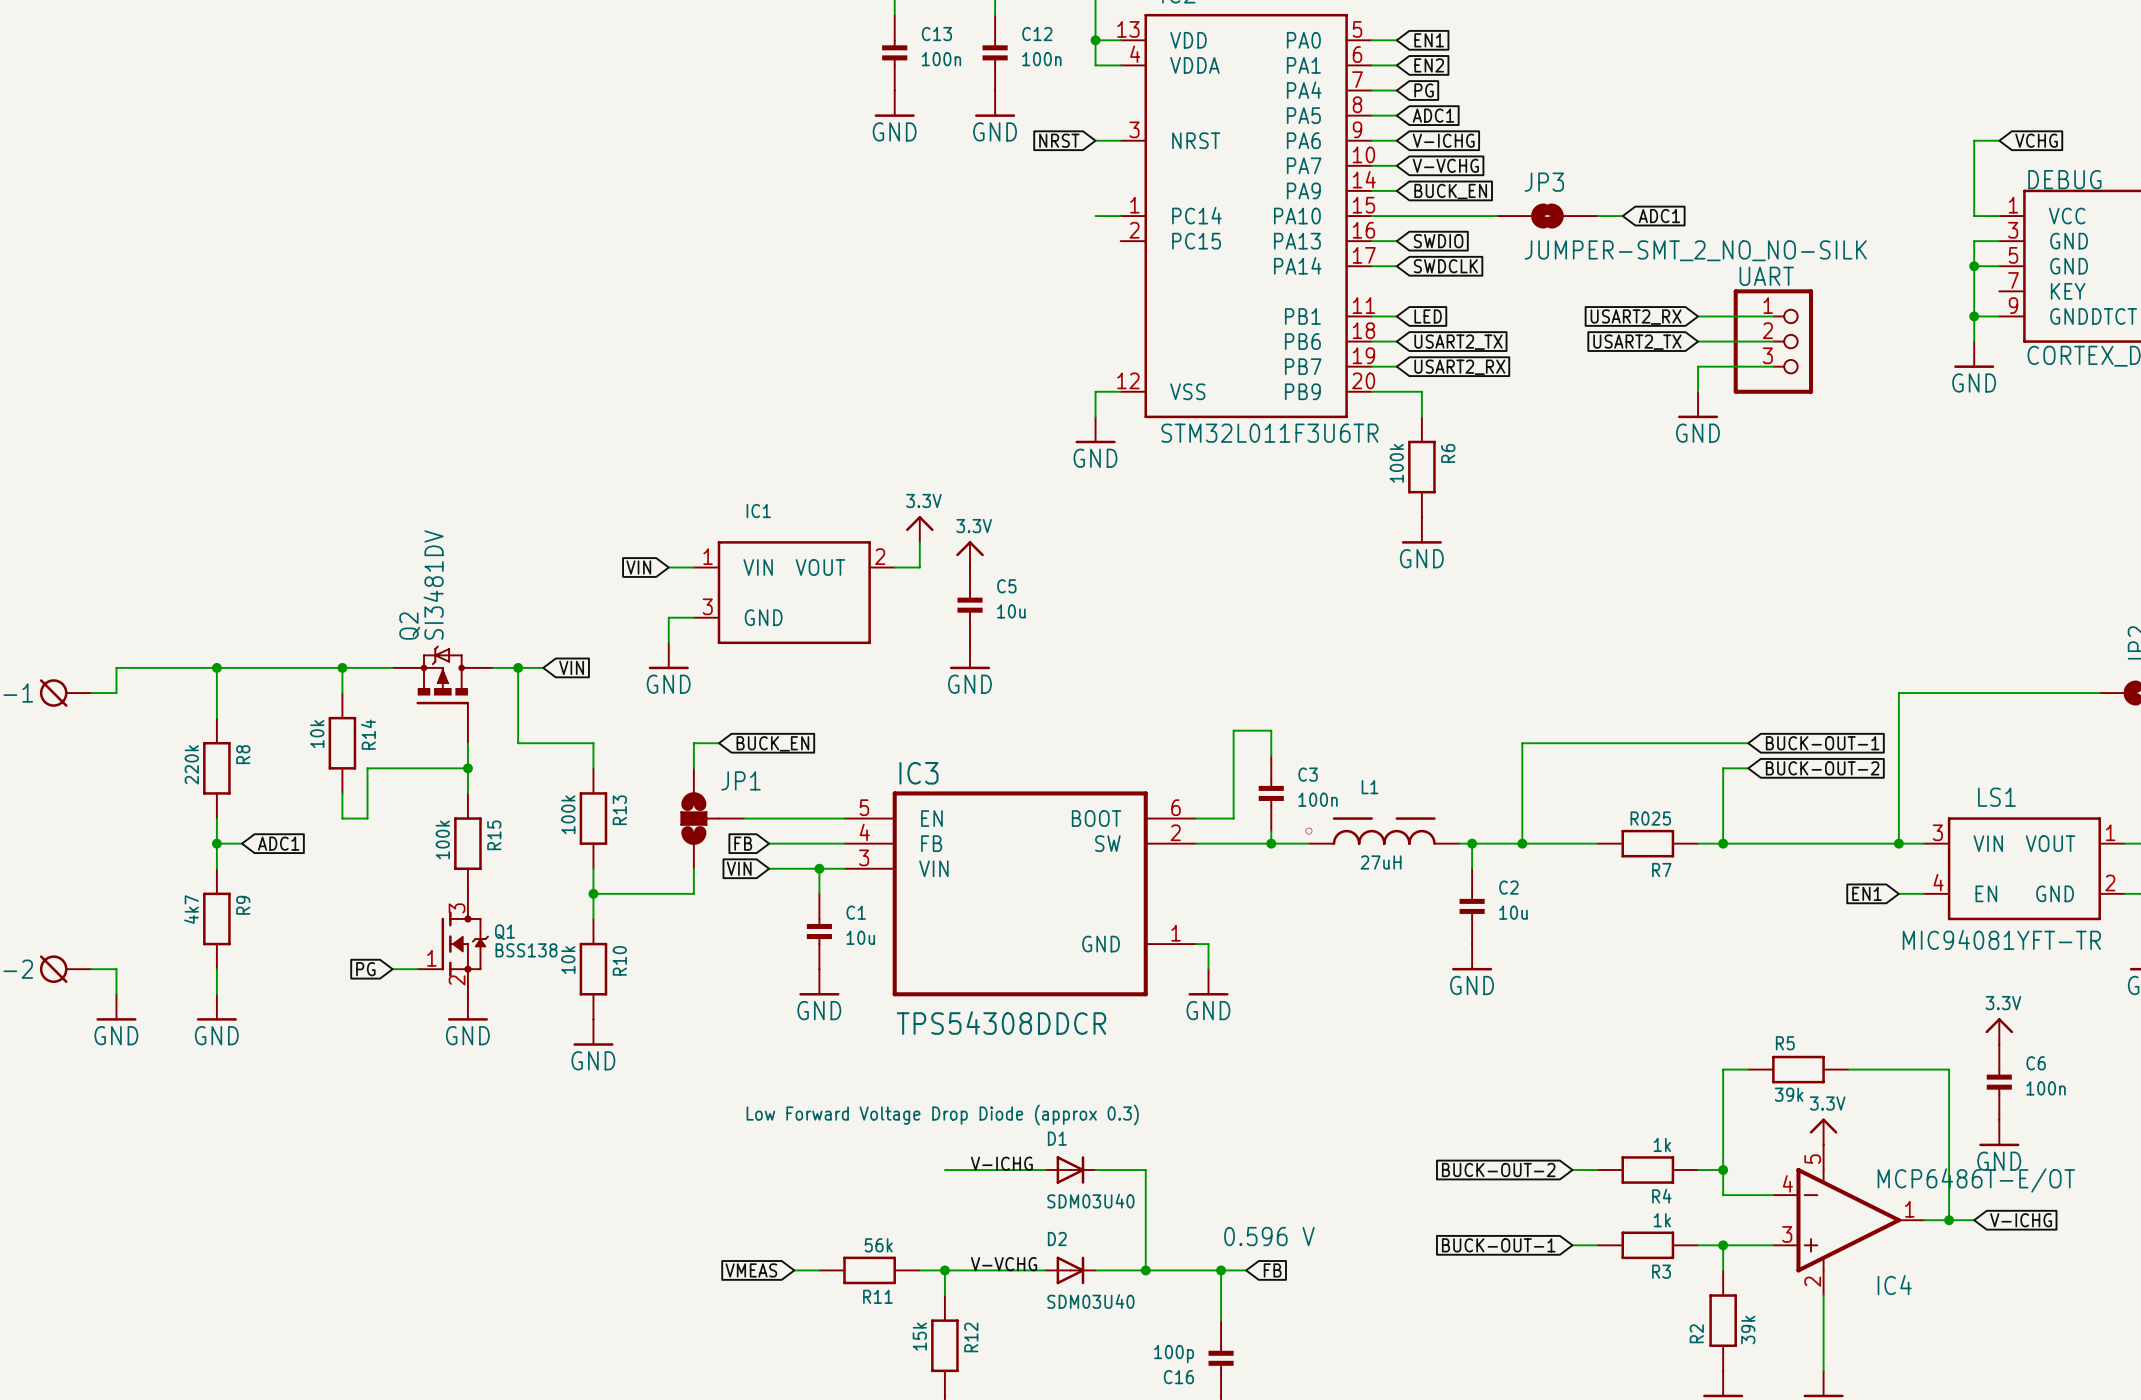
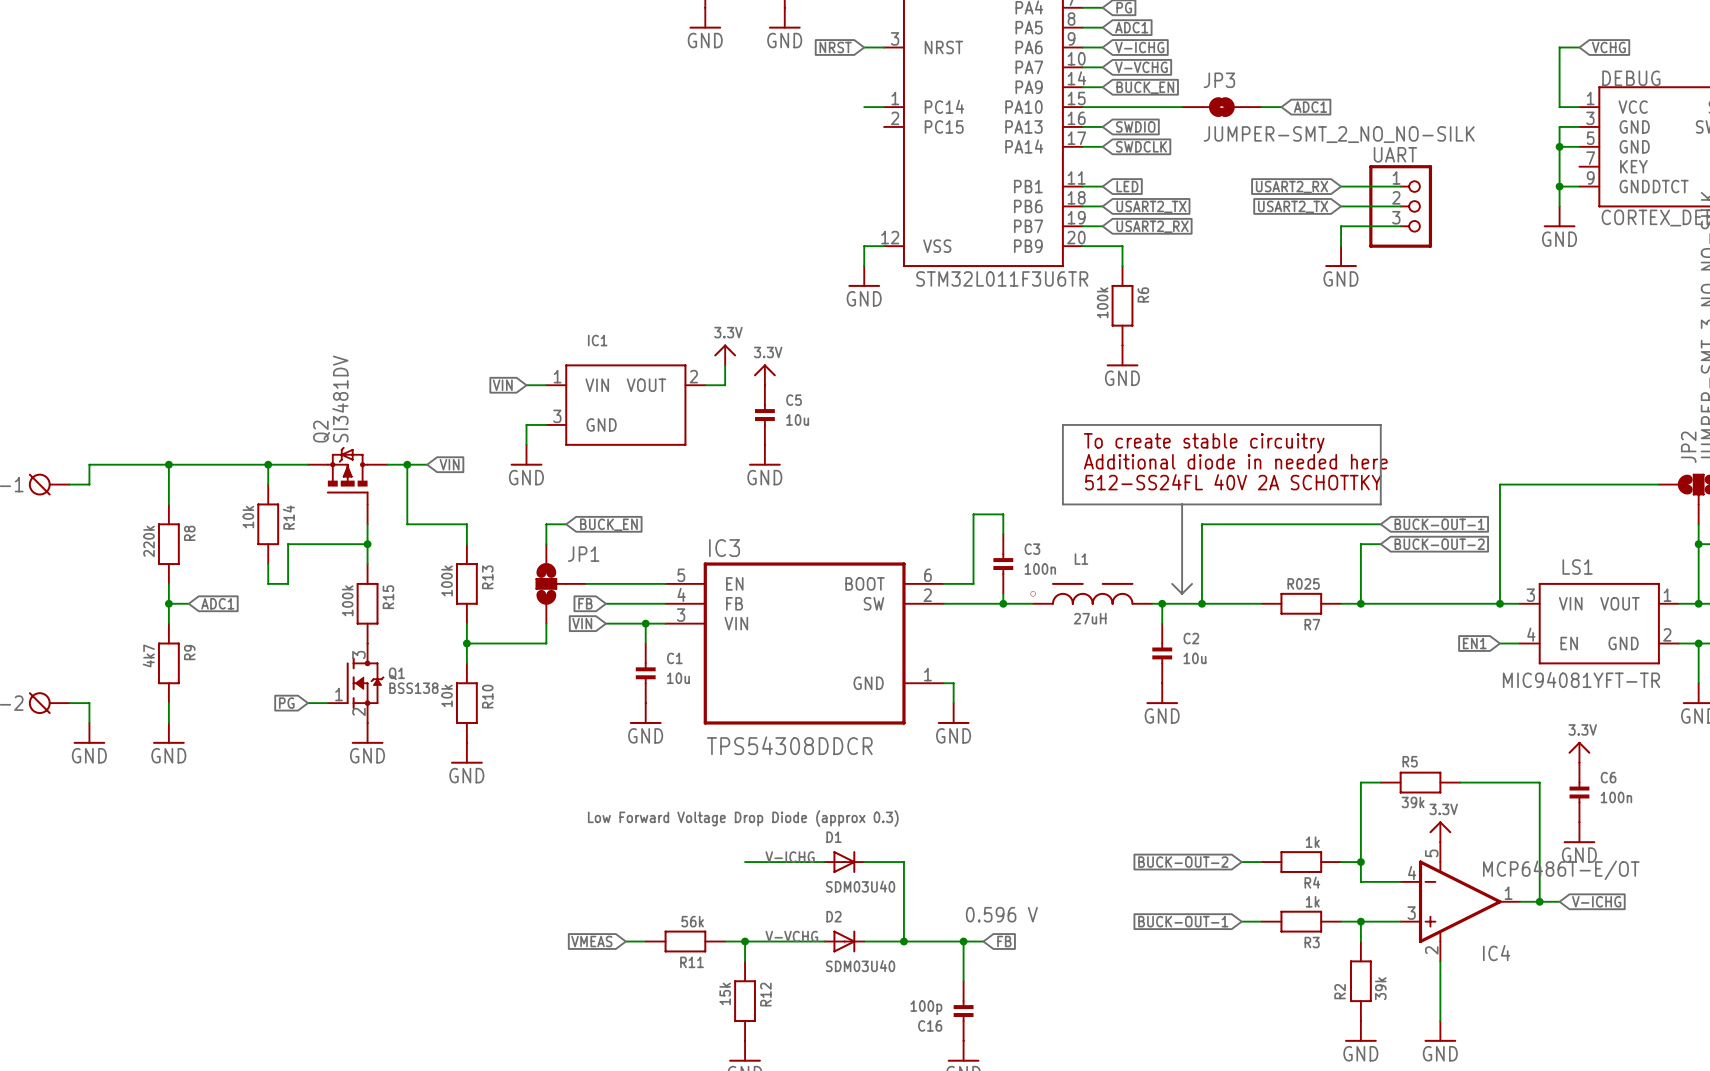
line: none -> (1062, 424) (1062, 504) (1380, 504) (1380, 424) (1062, 424)
text: none -> To create stable circuitry (1204, 443)
text: none -> Additional diode in needed here (1235, 461)
text: none -> 512-SS24FL 40V 2A SCHOTTKY (1233, 482)
line: none -> (1182, 504) (1182, 593)
line: none -> (1172, 583) (1182, 593)
line: none -> (1192, 583) (1182, 593)

